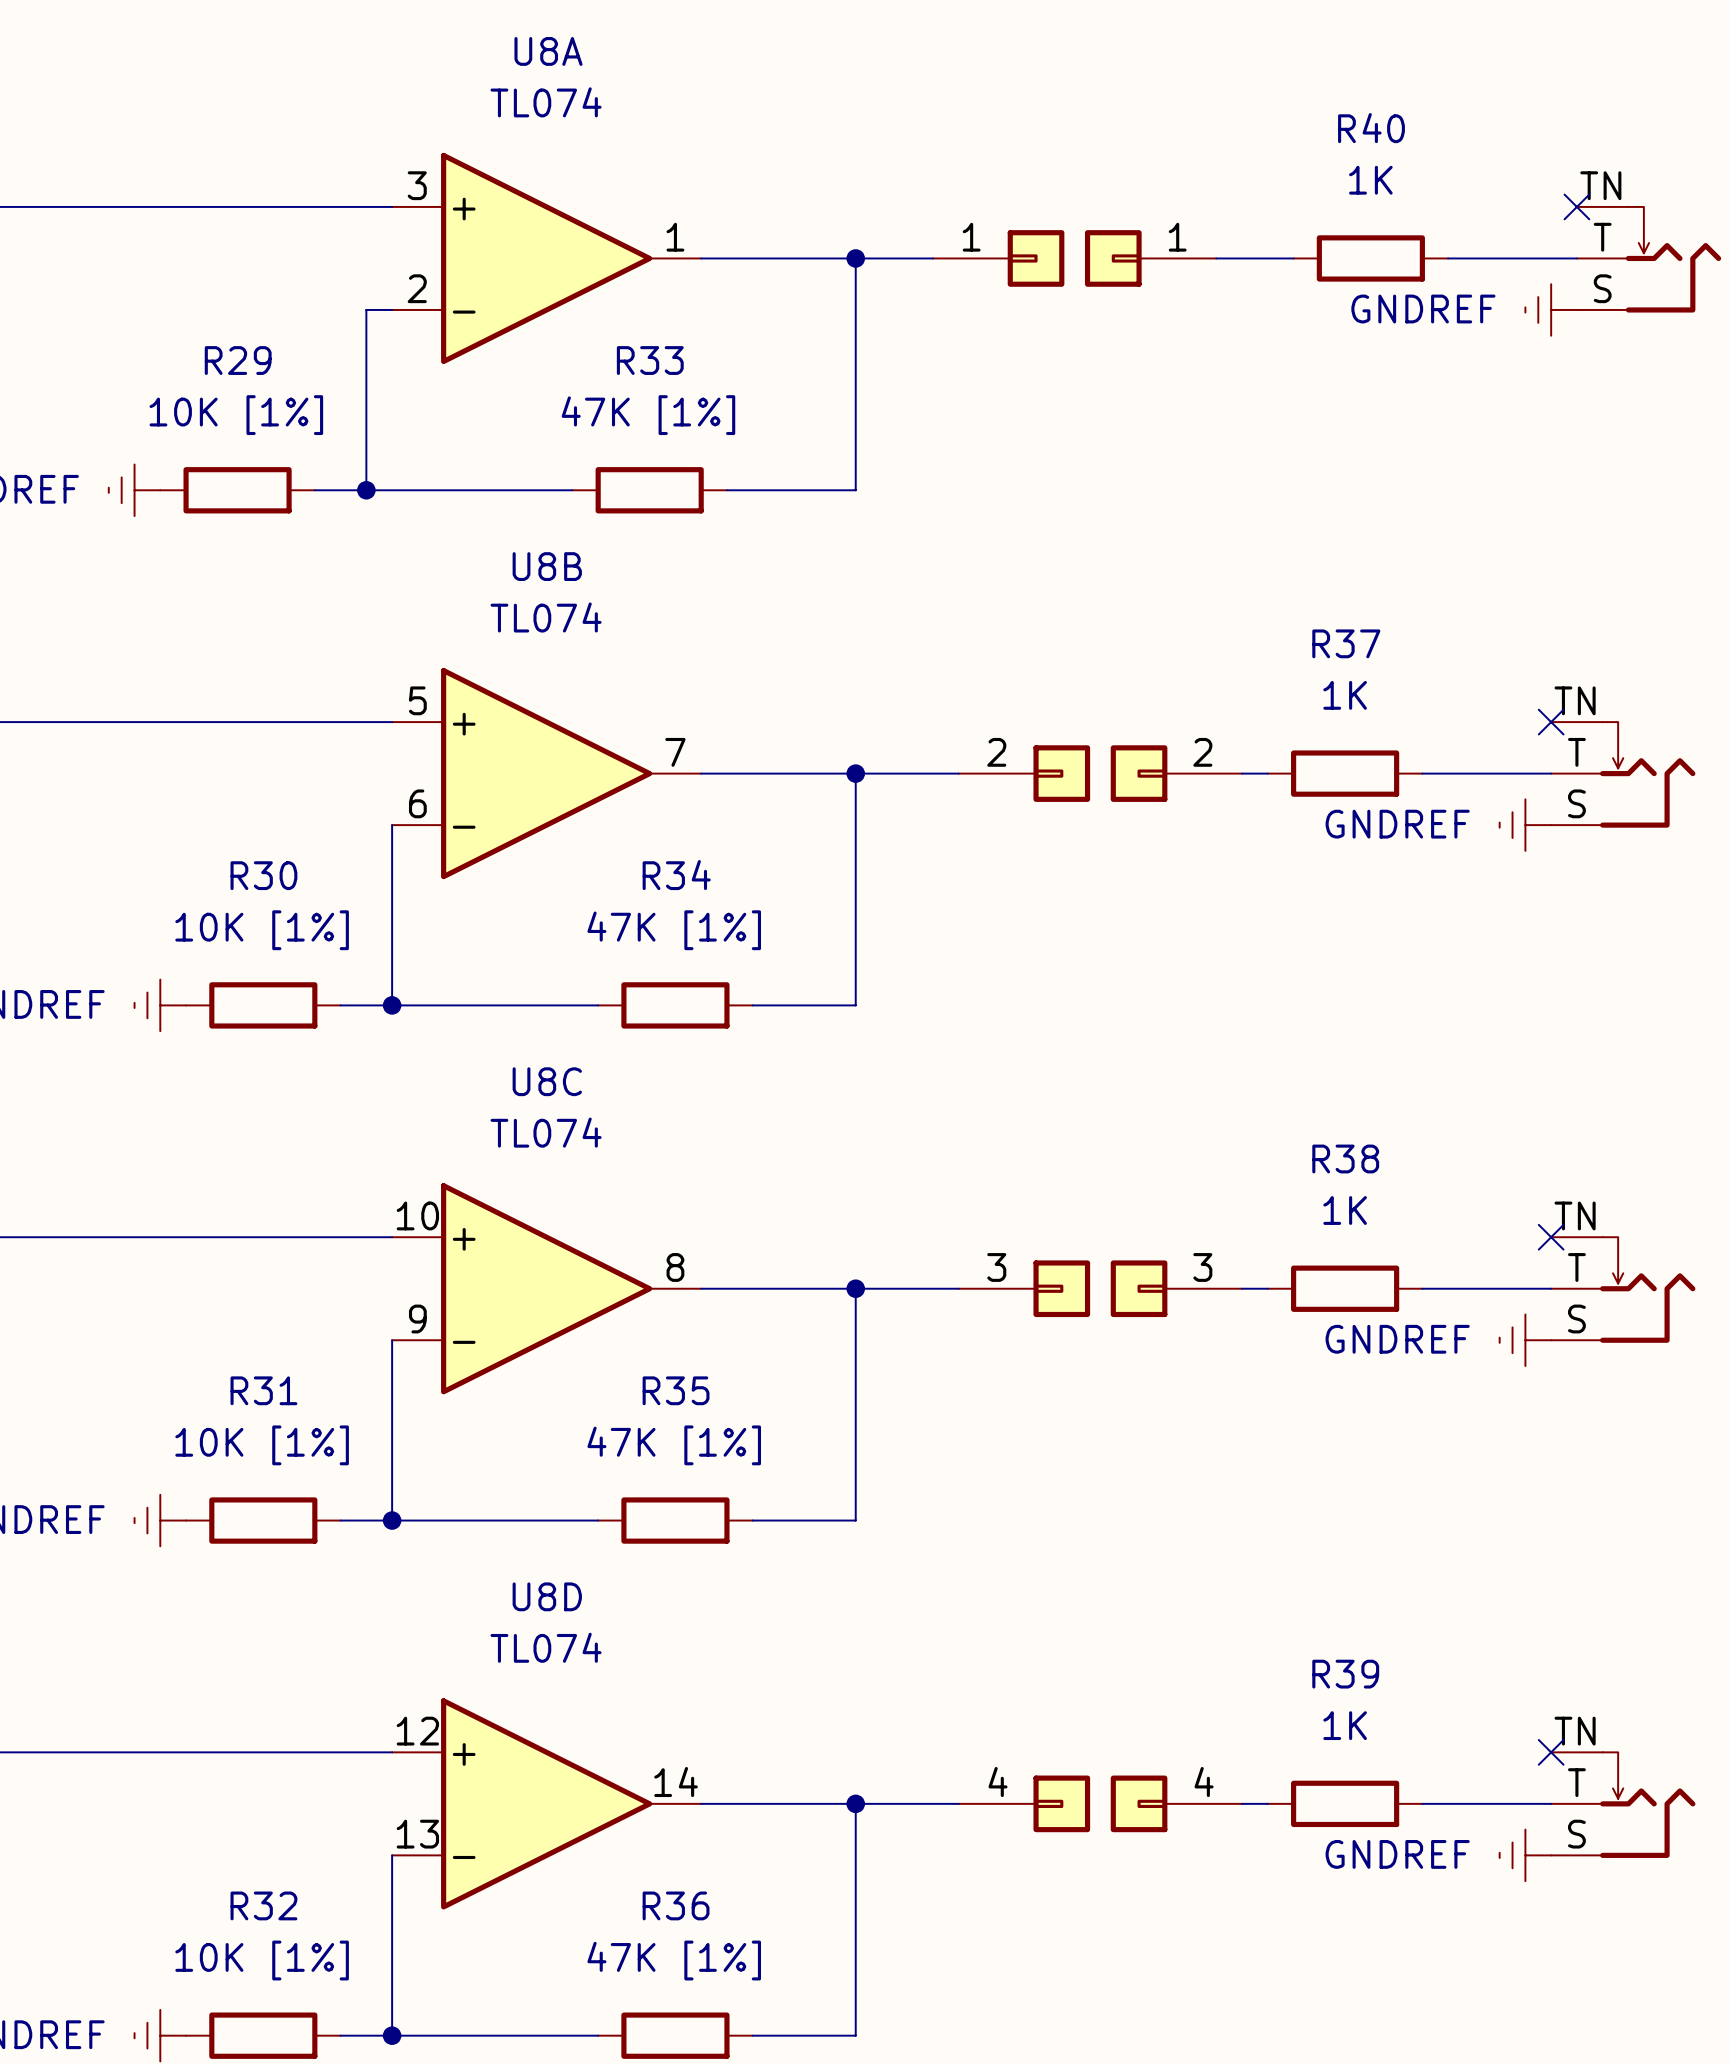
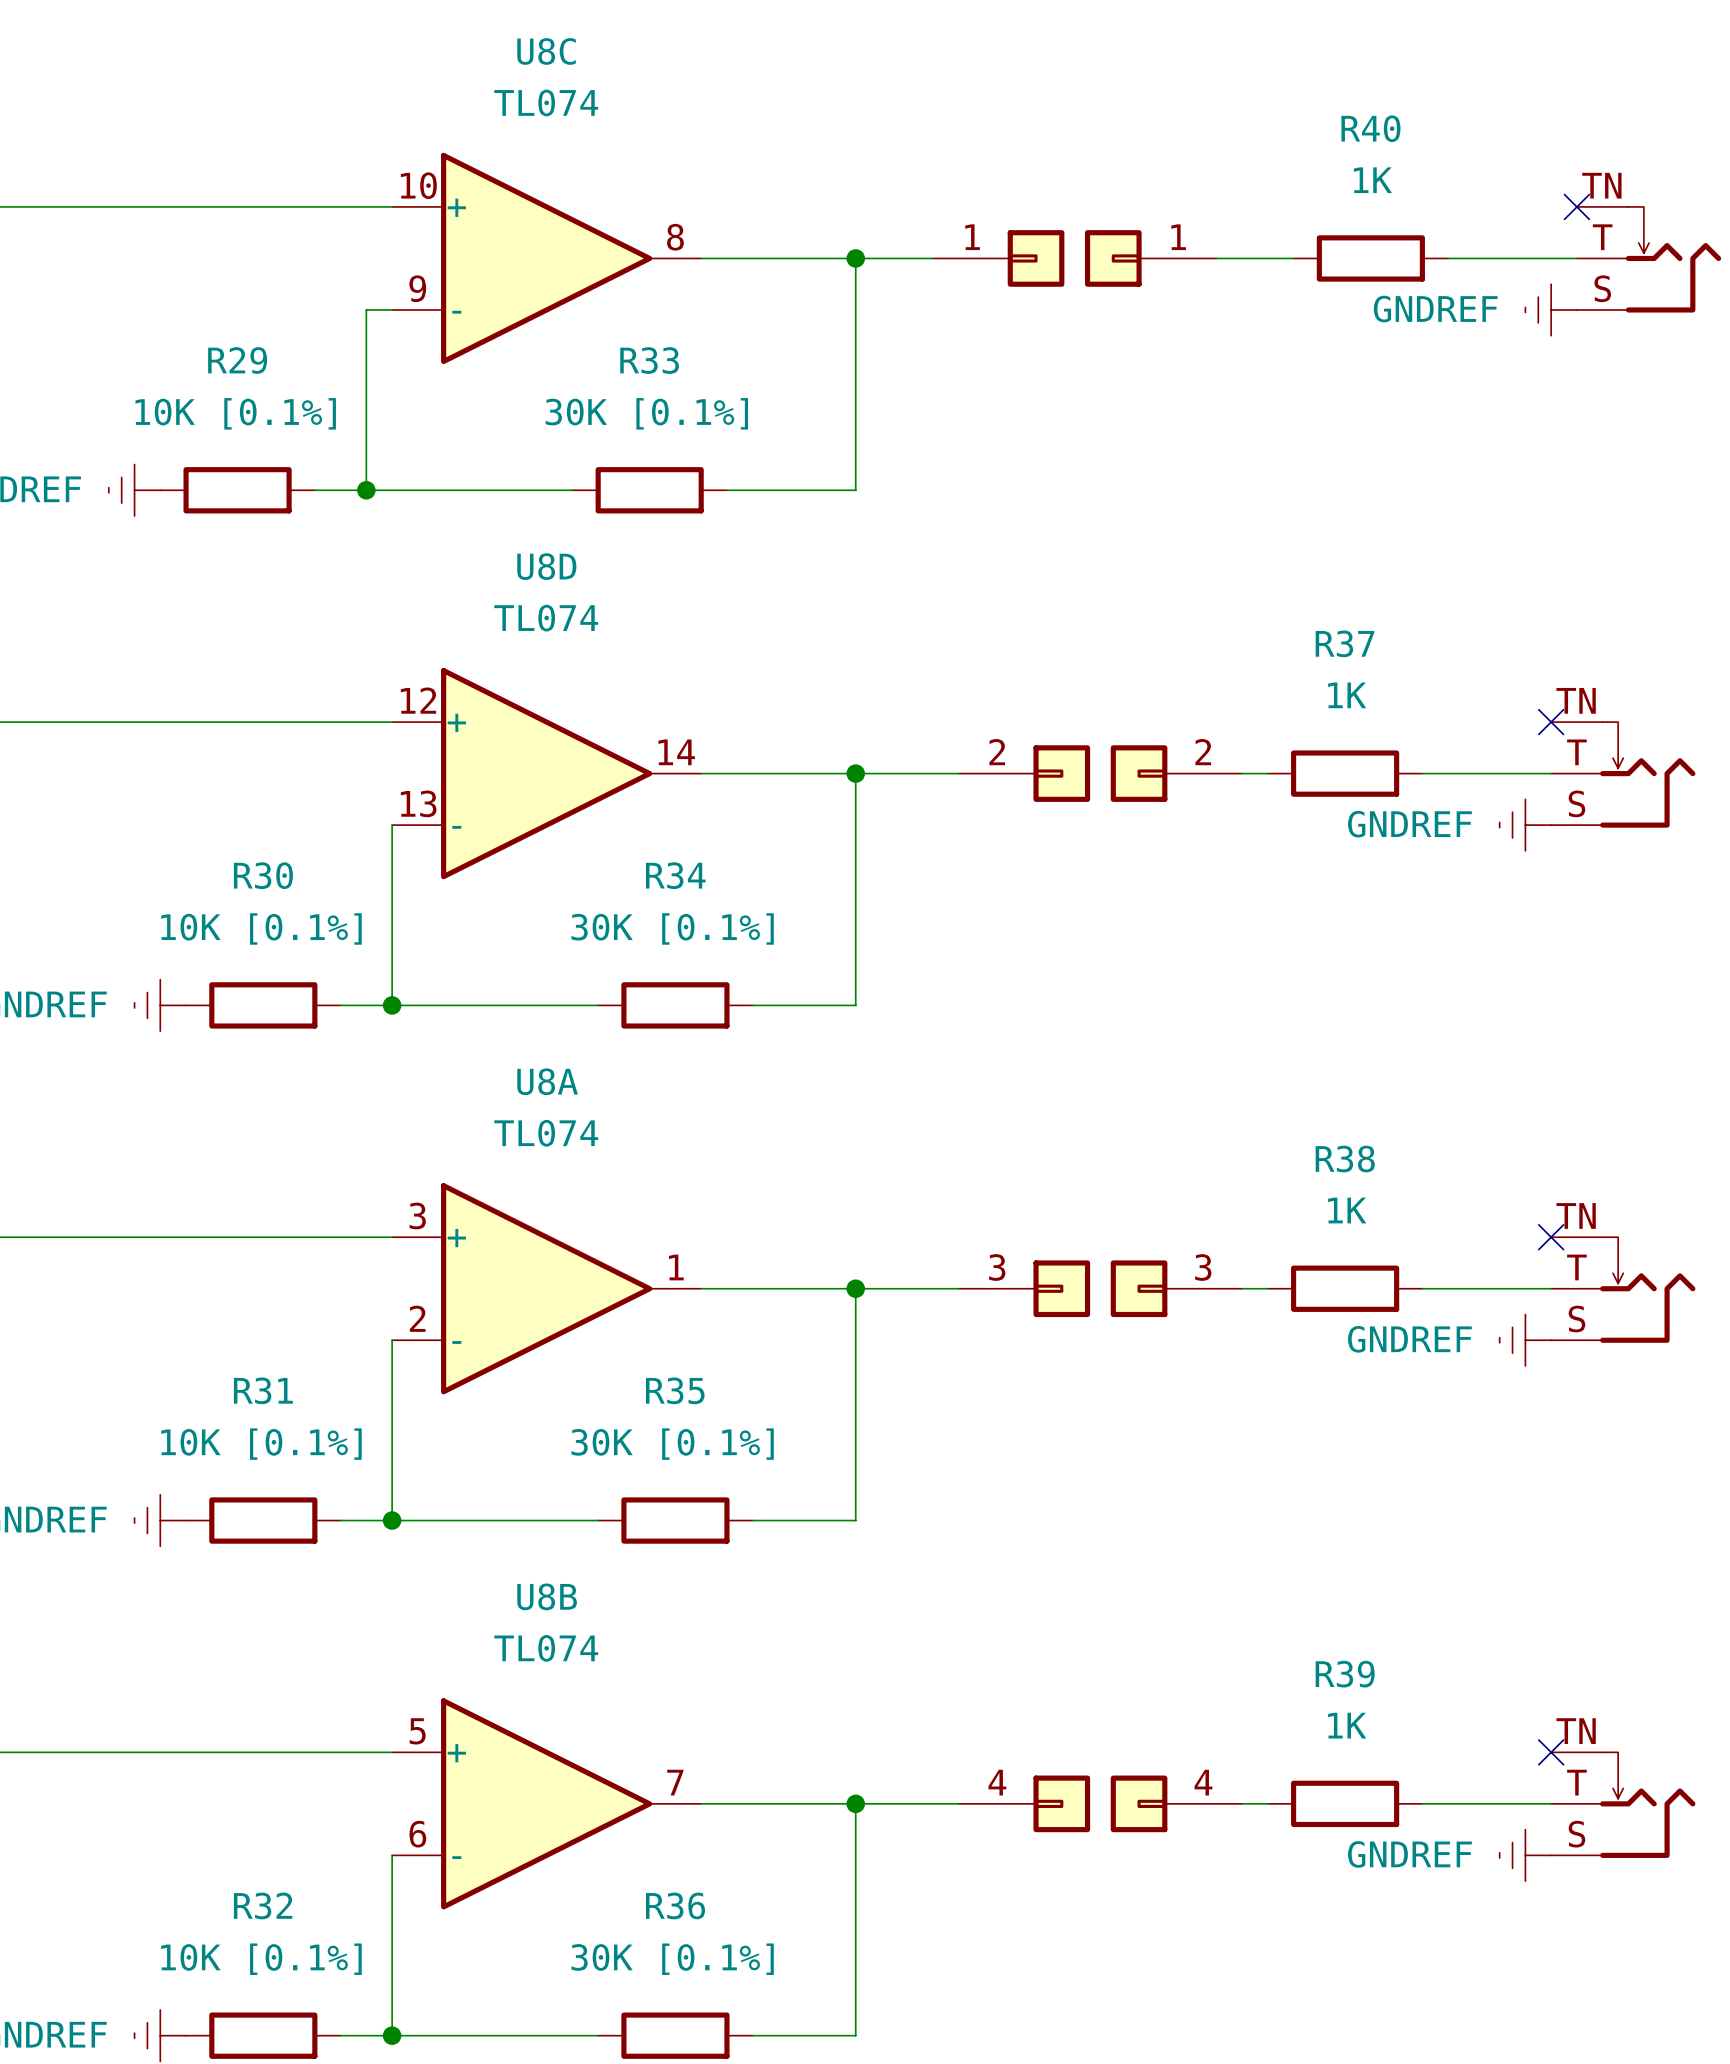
U8A position: (546, 258) -> (546, 1288)
R29 value: 10K [1%] (236, 415) -> 10K [0.1%] (235, 413)
R33 value: 47K [1%] (648, 415) -> 30K [0.1%] (646, 413)
U8B position: (546, 773) -> (546, 1803)
R30 value: 10K [1%] (262, 930) -> 10K [0.1%] (261, 928)
R34 value: 47K [1%] (674, 930) -> 30K [0.1%] (672, 928)
U8C position: (546, 1288) -> (546, 258)
R31 value: 10K [1%] (262, 1445) -> 10K [0.1%] (261, 1444)
R35 value: 47K [1%] (674, 1445) -> 30K [0.1%] (672, 1444)
U8D position: (546, 1803) -> (546, 773)
R32 value: 10K [1%] (262, 1960) -> 10K [0.1%] (261, 1959)
R36 value: 47K [1%] (674, 1960) -> 30K [0.1%] (672, 1959)

